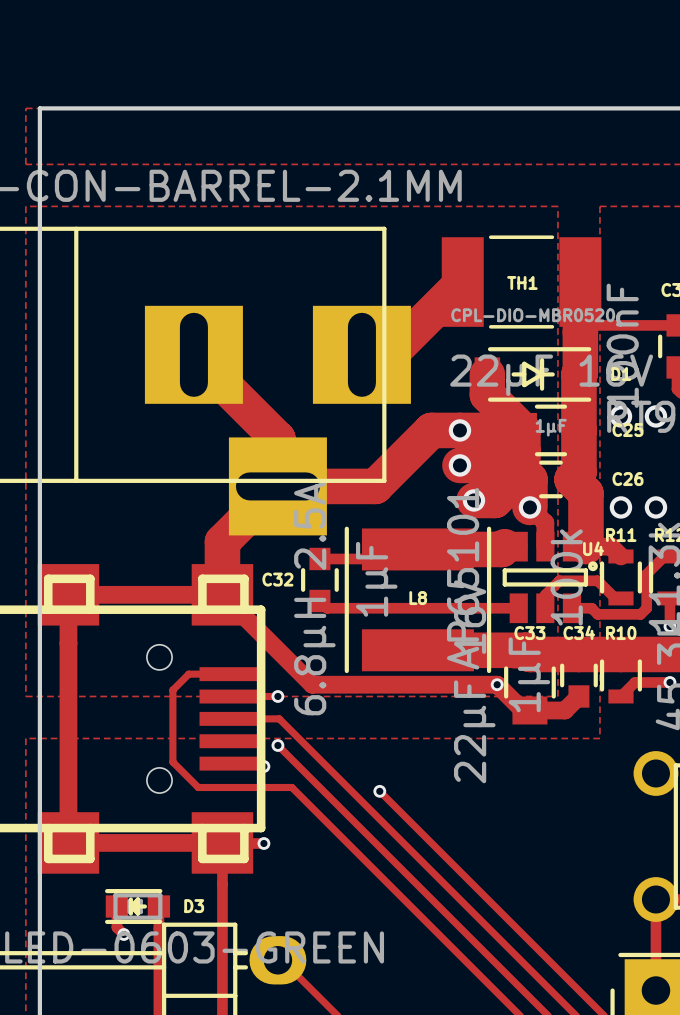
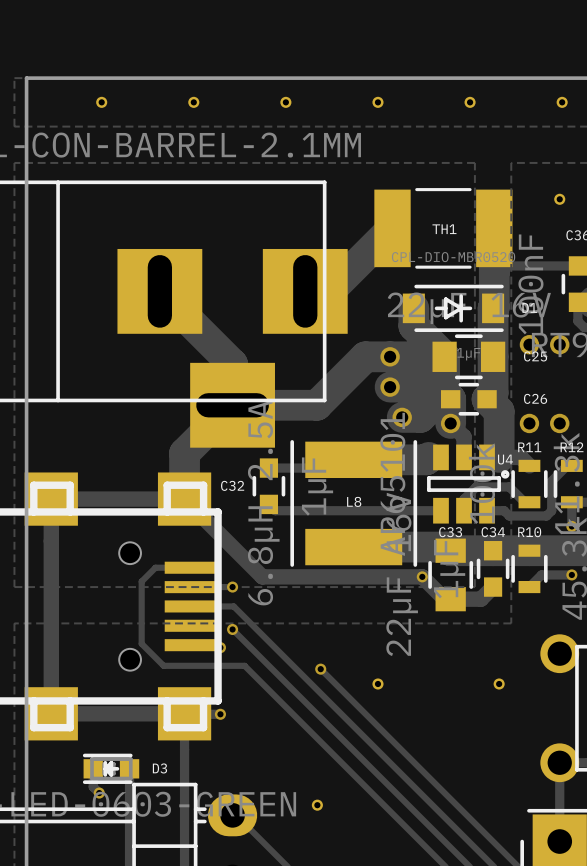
part: none -> (101, 102)
part: none -> (193, 102)
part: none -> (285, 102)
part: none -> (377, 102)
part: none -> (470, 102)
part: none -> (562, 102)
part: none -> (559, 199)
part: none -> (377, 684)
part: none -> (499, 684)
part: none -> (317, 805)

